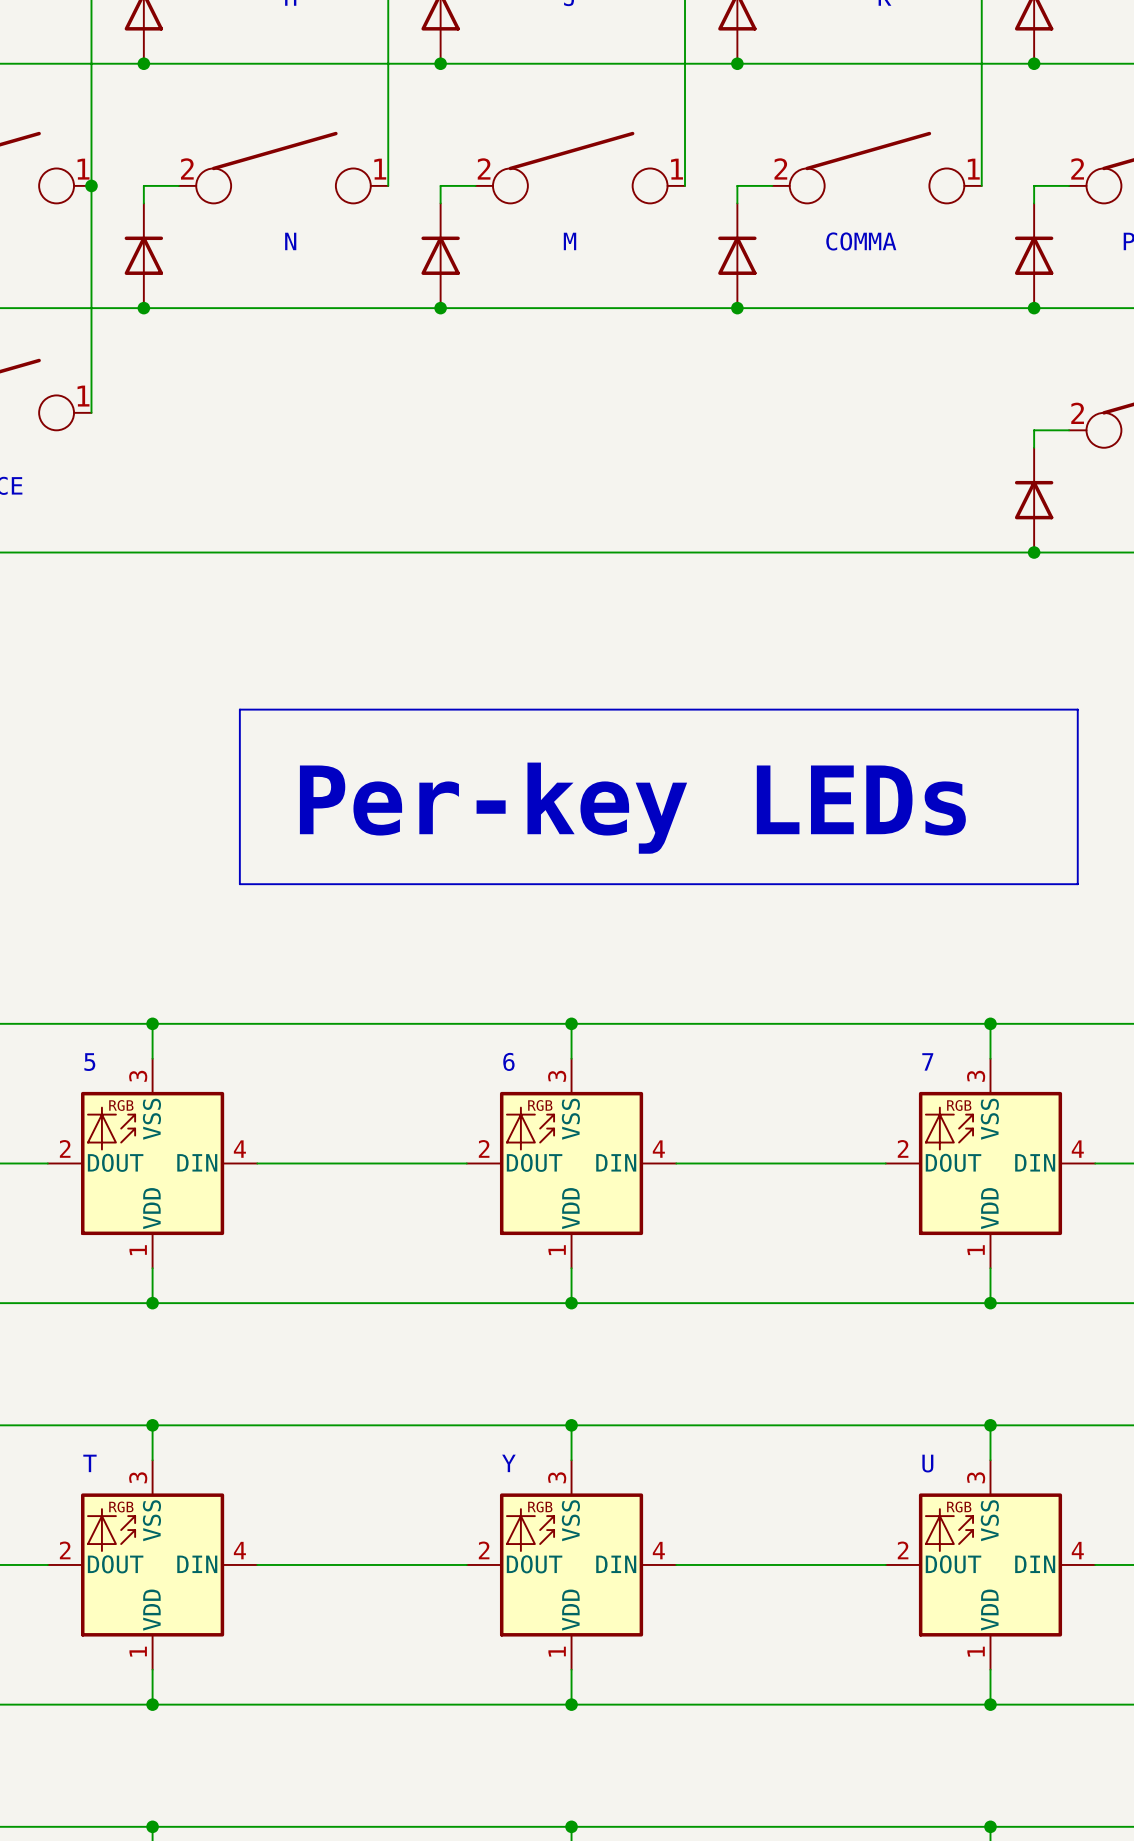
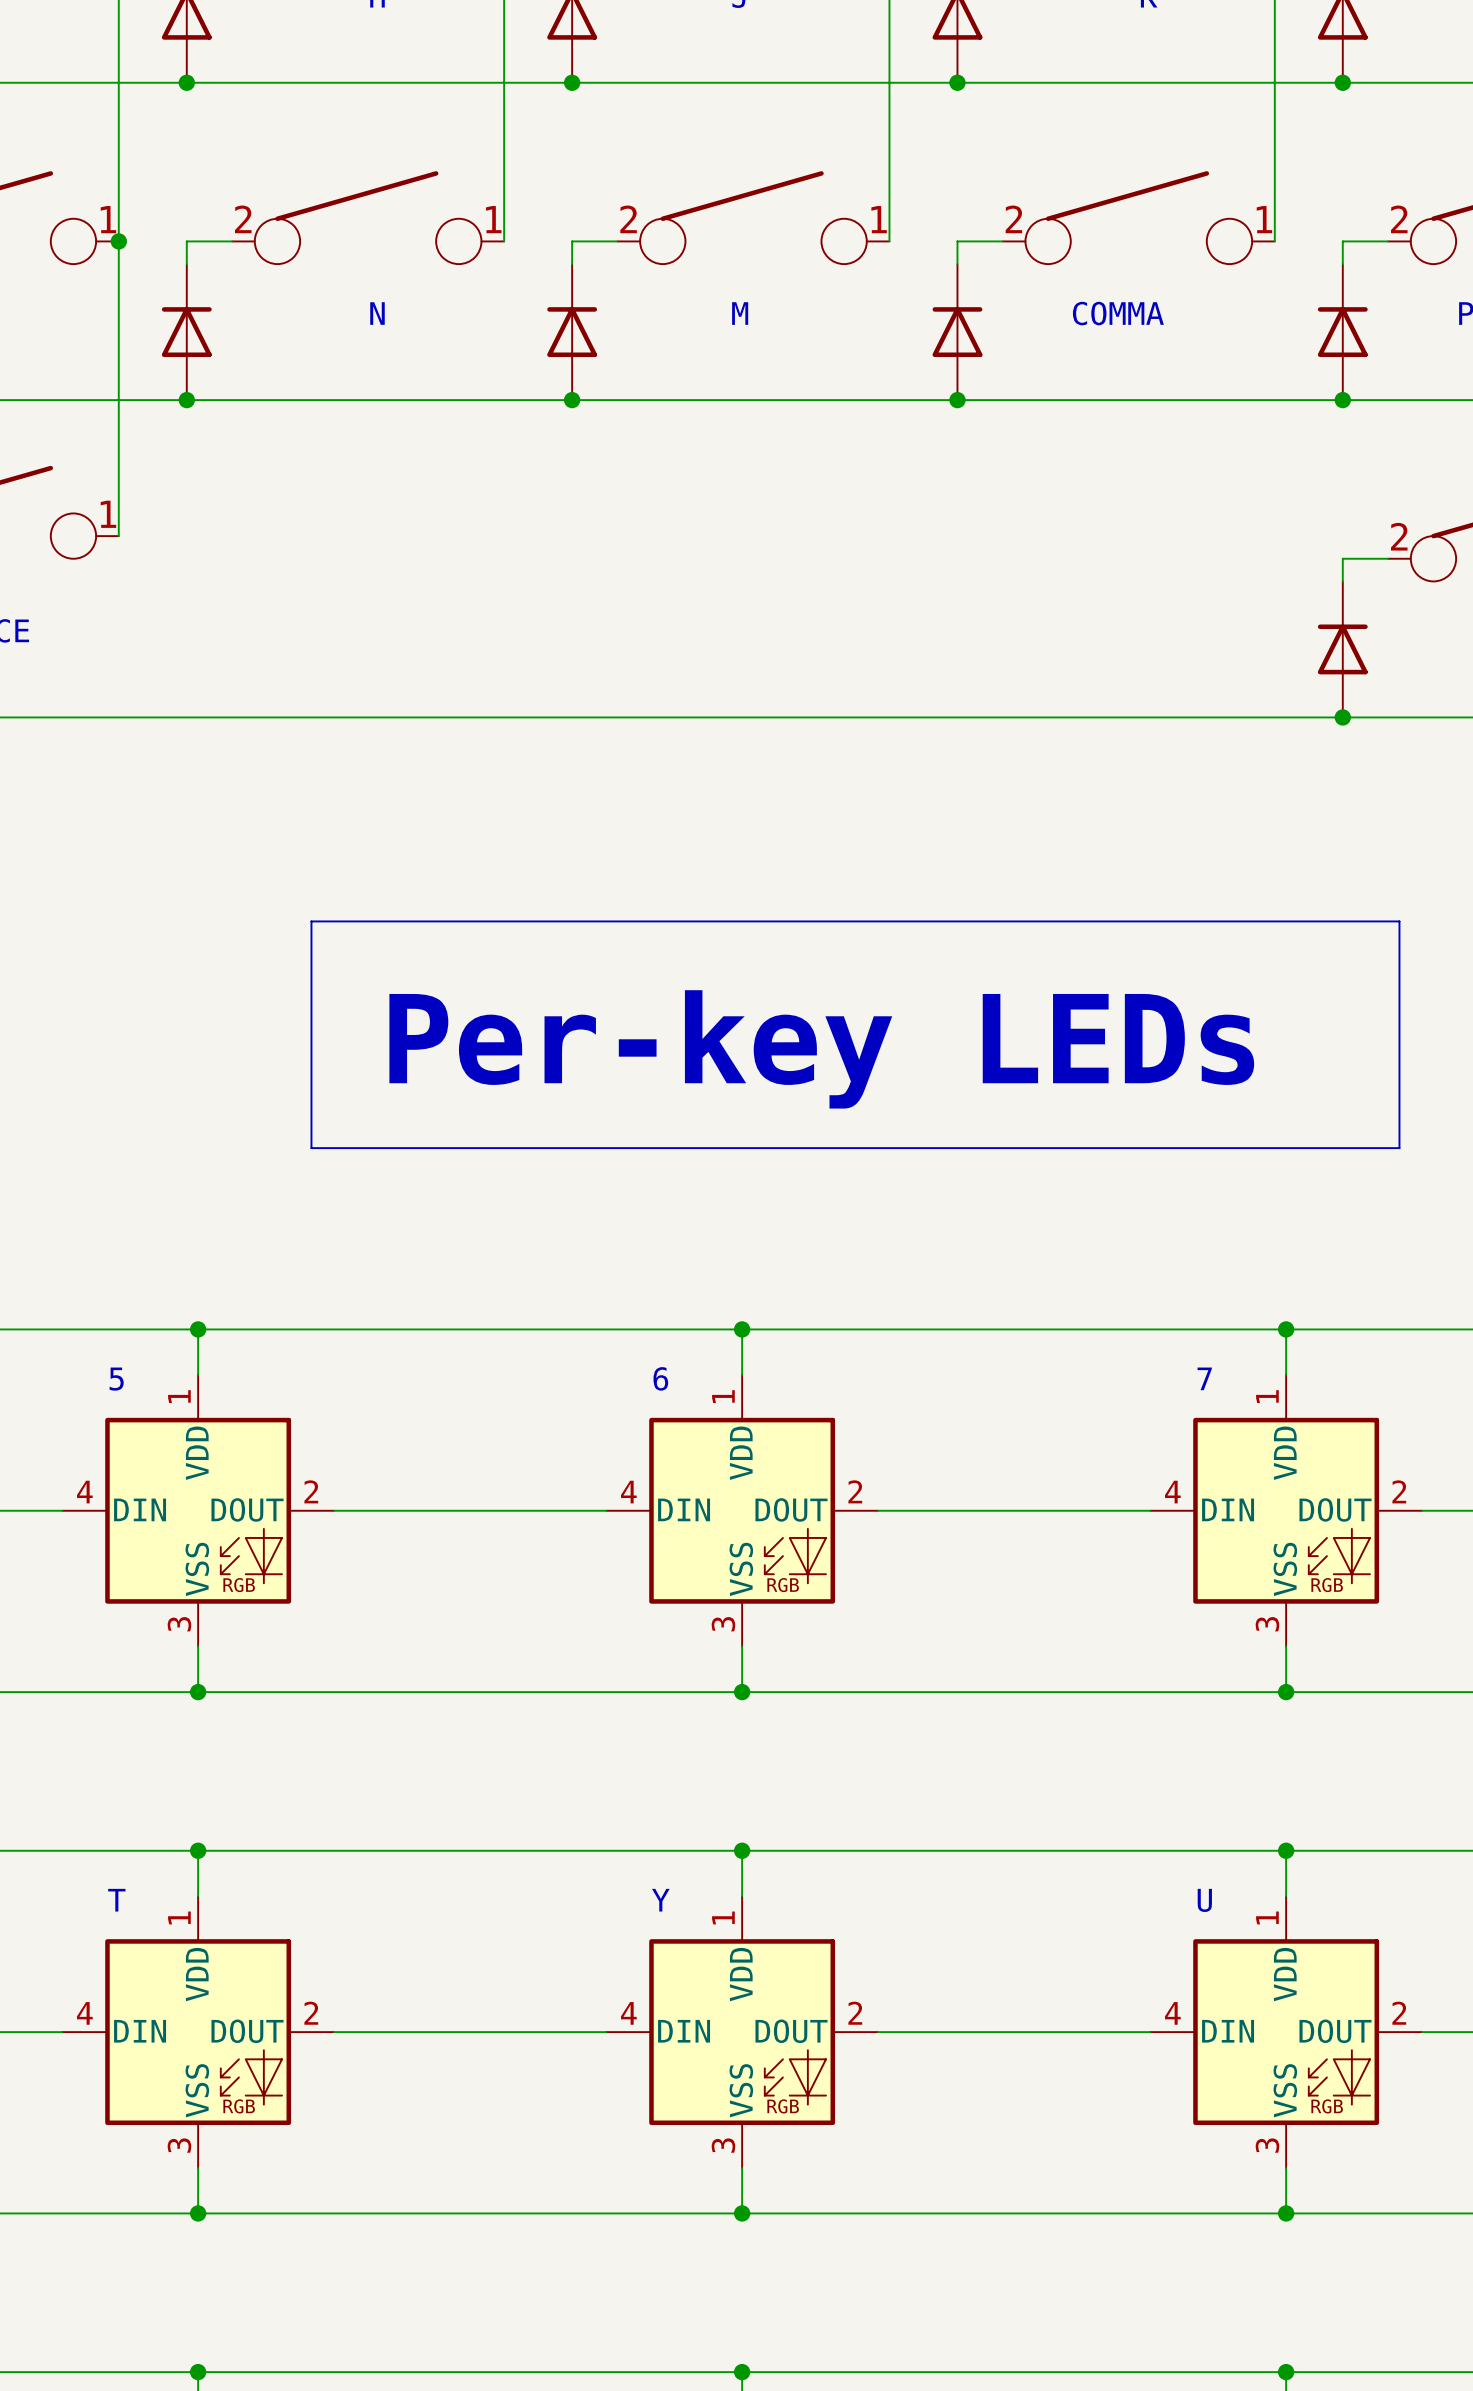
part rotation: 0° (152, 1163) -> 180° (198, 1510)
part rotation: 0° (571, 1163) -> 180° (742, 1510)
part rotation: 0° (990, 1163) -> 180° (1286, 1510)
part rotation: 0° (152, 1564) -> 180° (198, 2032)
part rotation: 0° (571, 1564) -> 180° (742, 2032)
part rotation: 0° (990, 1564) -> 180° (1286, 2032)

